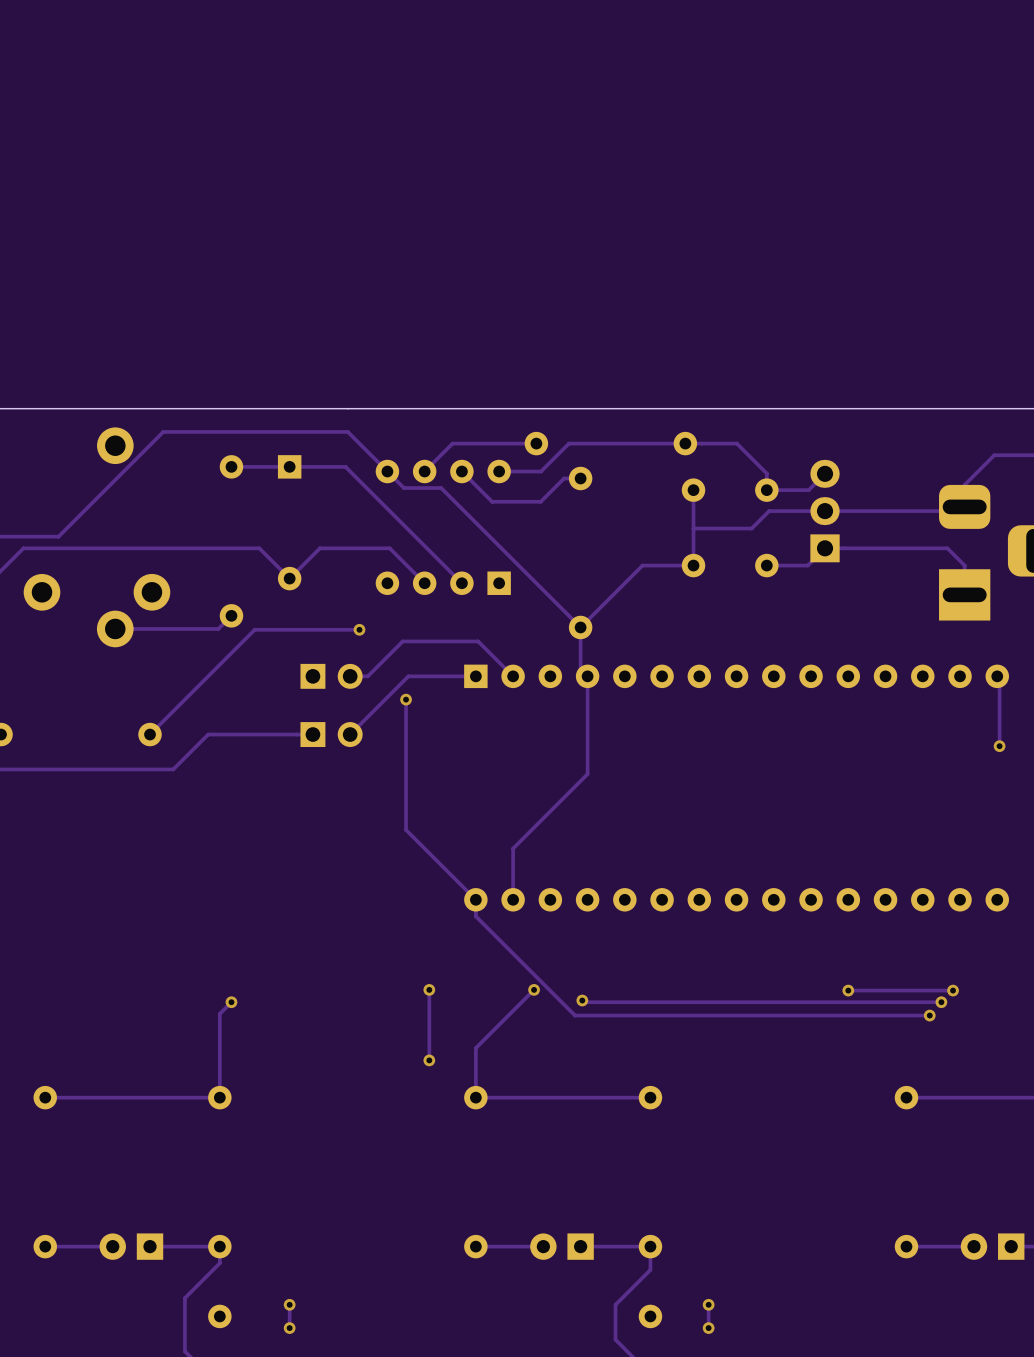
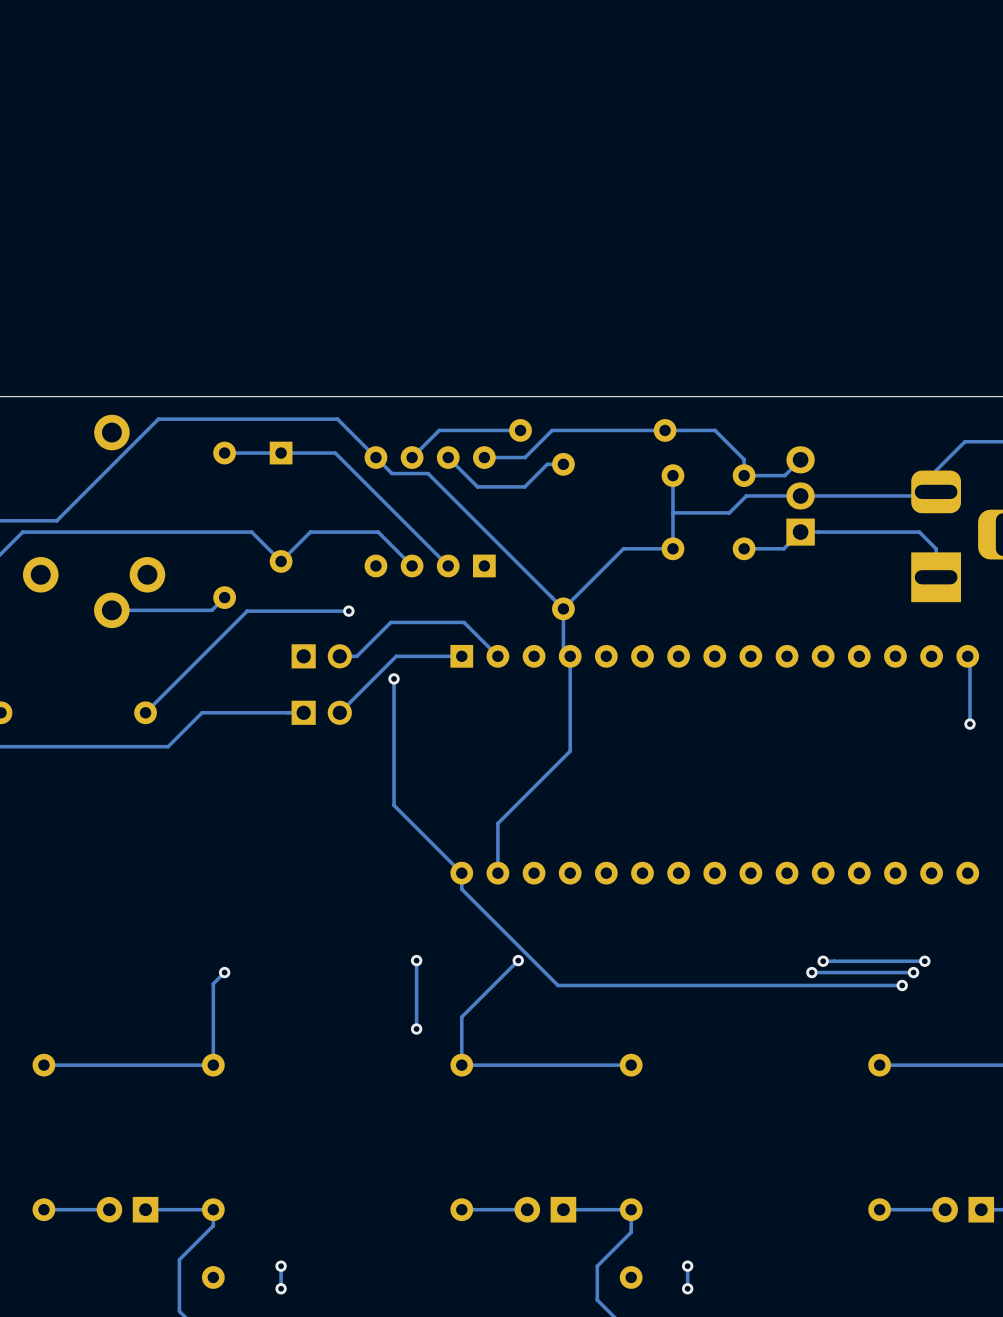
track: (582, 1000) (584, 1002) (836, 1002) -> none
via: (582, 1000) -> none
via: none -> (811, 972)

